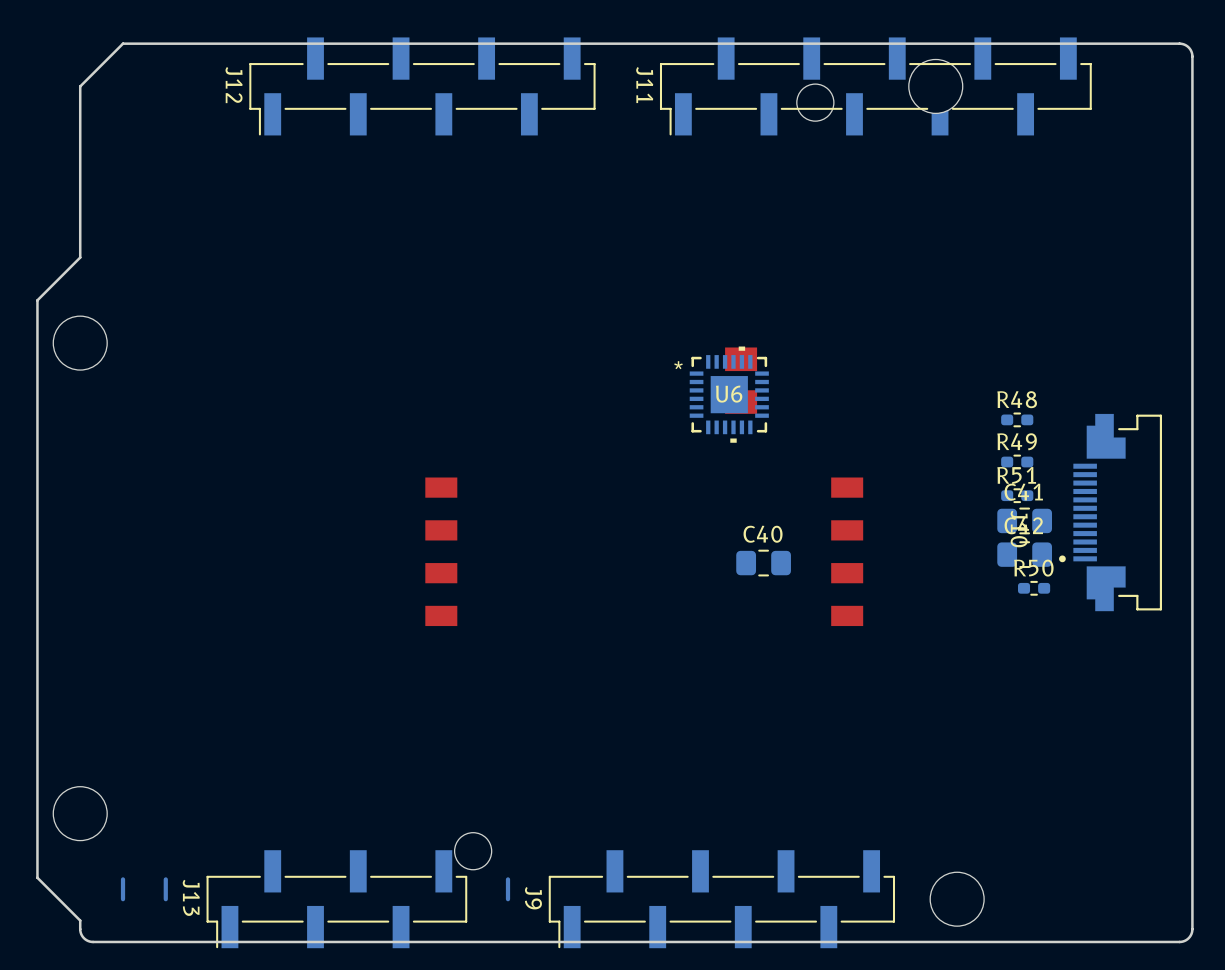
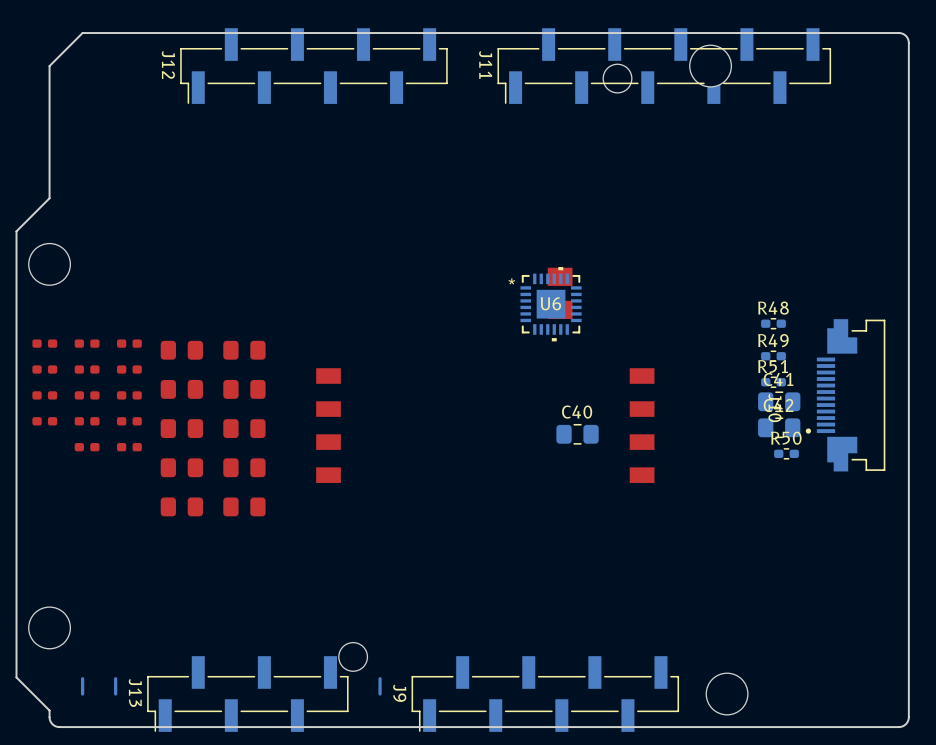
part: none -> (44, 343)
part: none -> (87, 343)
part: none -> (129, 343)
part: none -> (181, 350)
part: none -> (244, 350)
part: none -> (44, 369)
part: none -> (87, 369)
part: none -> (129, 369)
part: none -> (181, 389)
part: none -> (244, 389)
part: none -> (44, 395)
part: none -> (87, 395)
part: none -> (129, 395)
part: none -> (44, 421)
part: none -> (87, 421)
part: none -> (129, 421)
part: none -> (181, 428)
part: none -> (244, 428)
part: none -> (87, 447)
part: none -> (129, 447)
part: none -> (181, 467)
part: none -> (244, 467)
part: none -> (181, 506)
part: none -> (244, 506)

